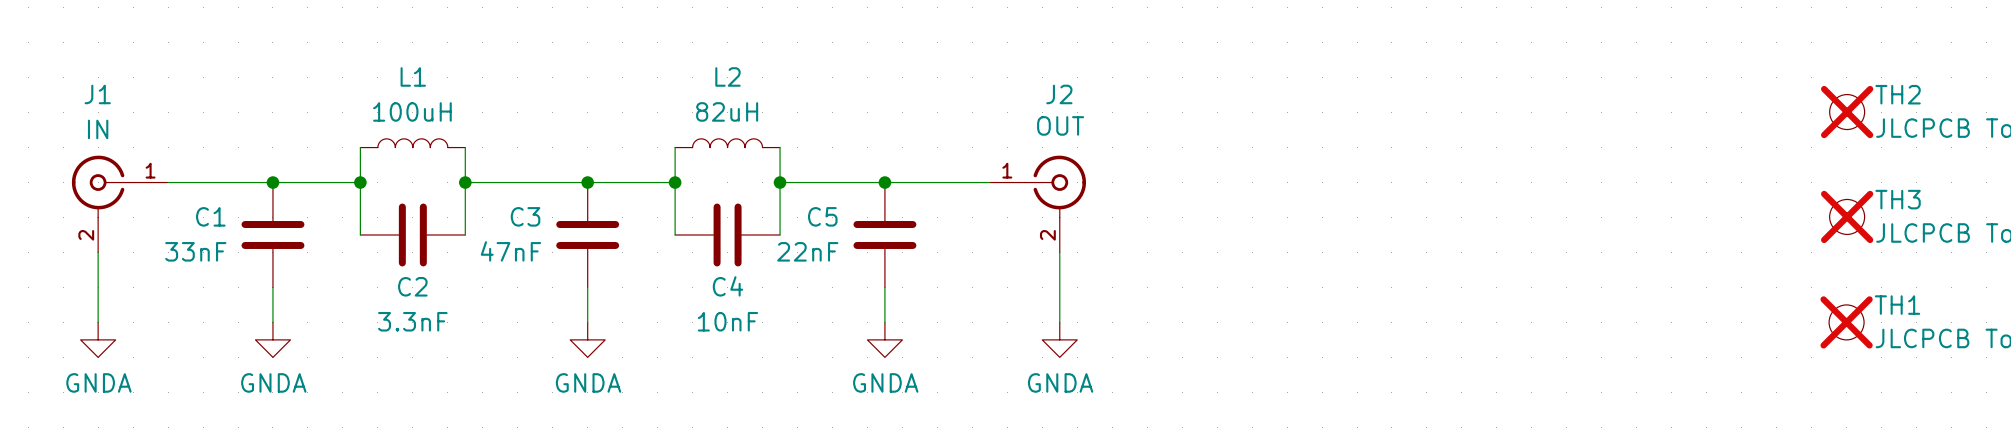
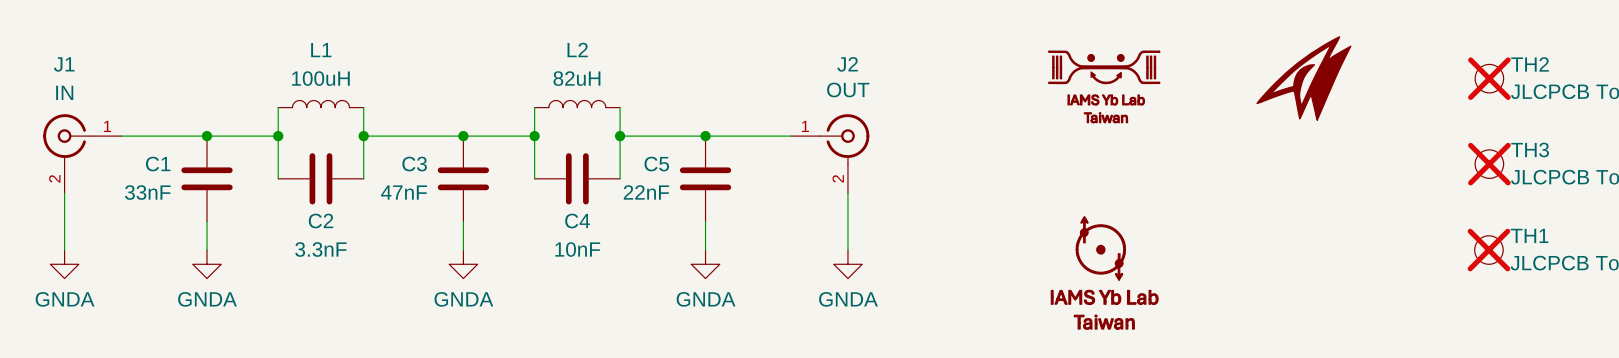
part: none -> (1303, 78)
part: none -> (1104, 86)
part: none -> (1104, 272)

